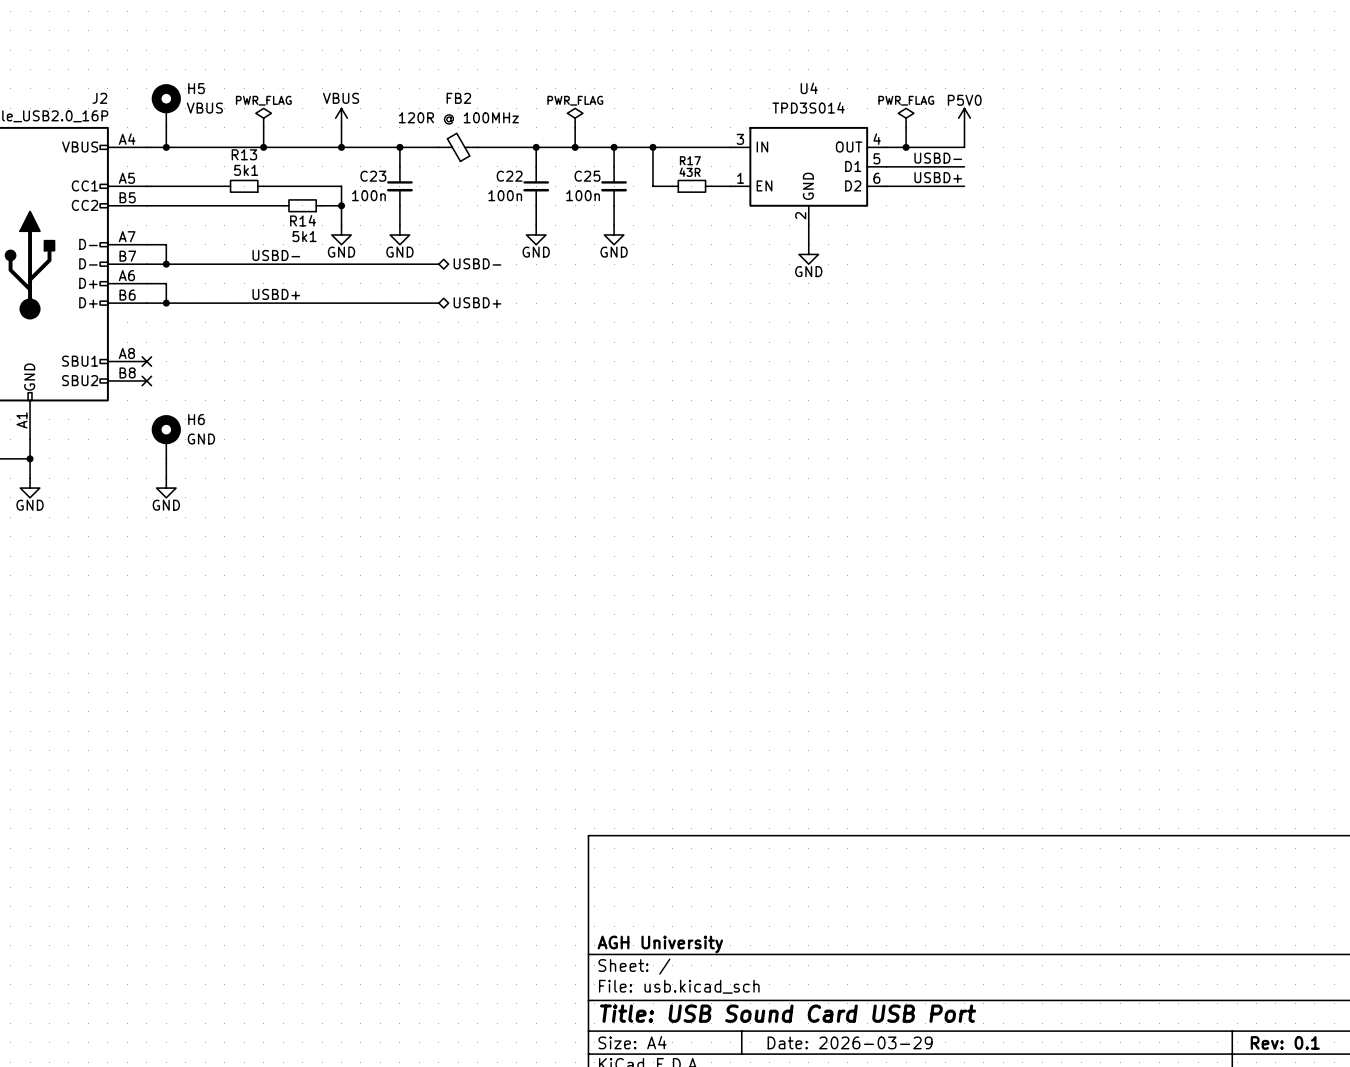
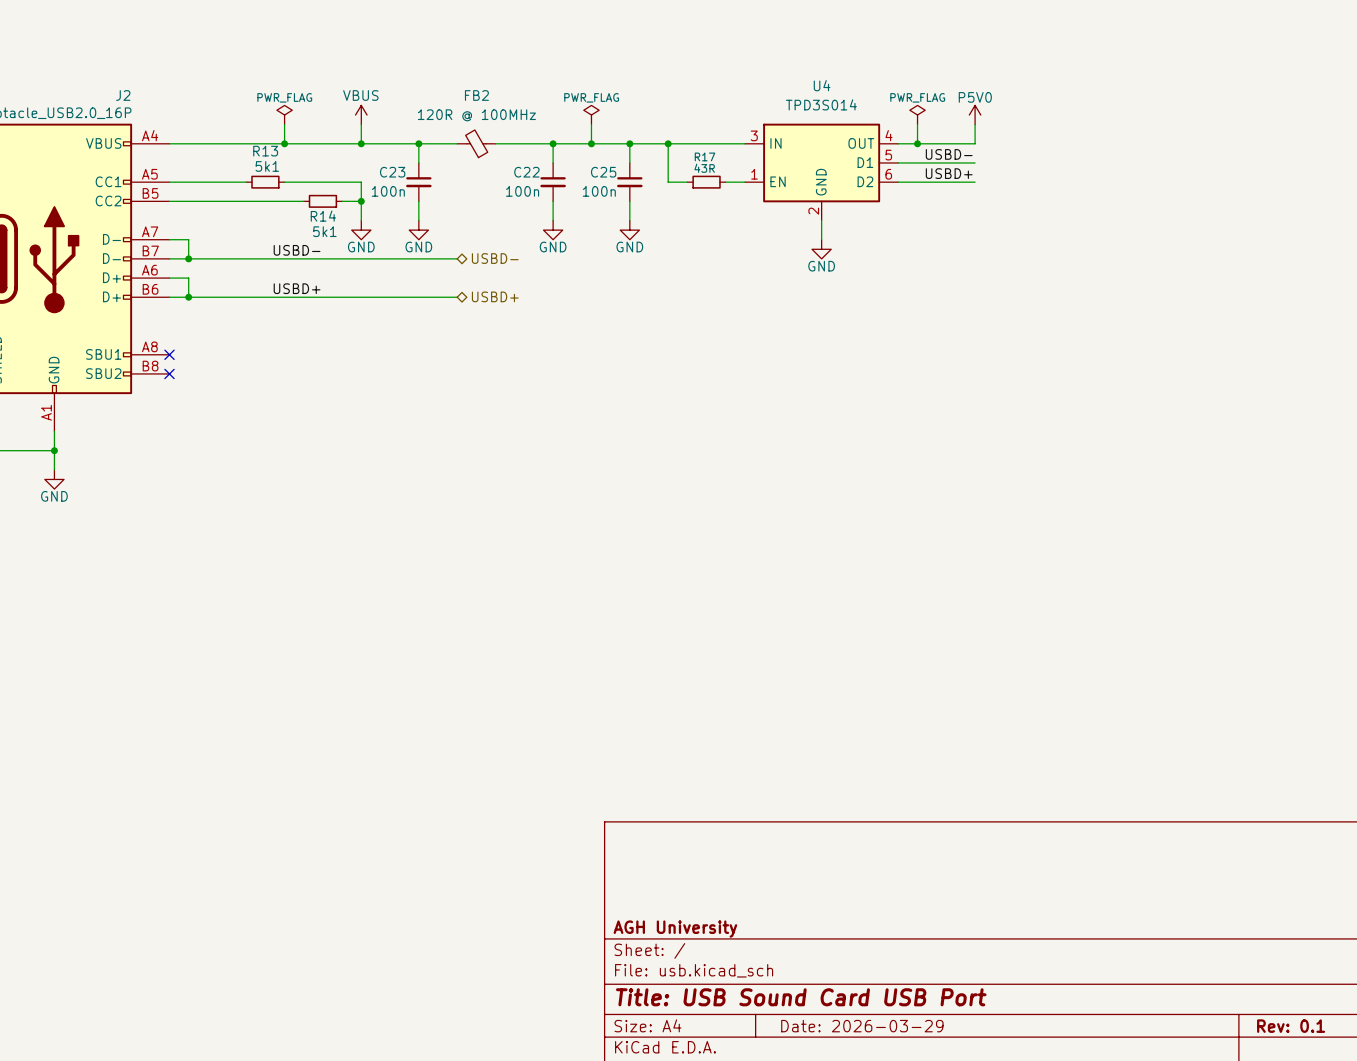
H5: VBUS (166, 106) -> none
wire: (166, 127) (166, 147) -> none
junction: (166, 147) -> none
H6: GND (166, 436) -> none
wire: (166, 458) (166, 478) -> none
power symbol: GND (166, 488) -> none

